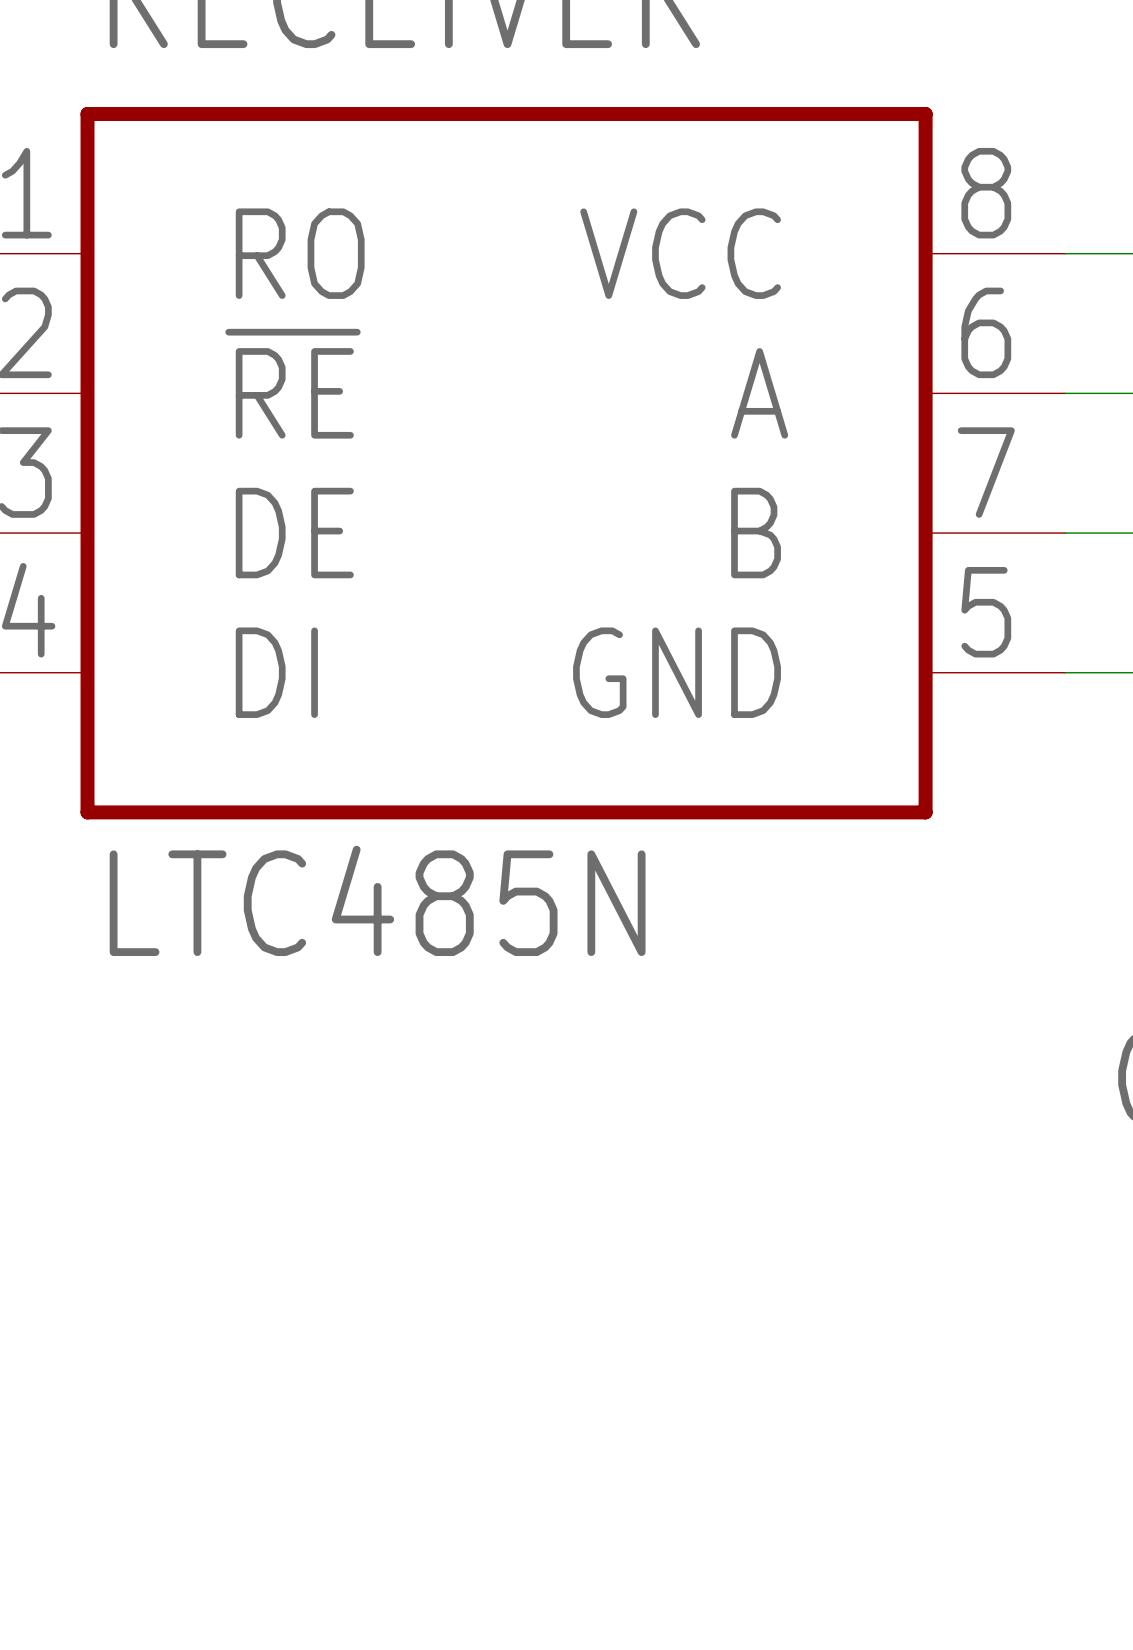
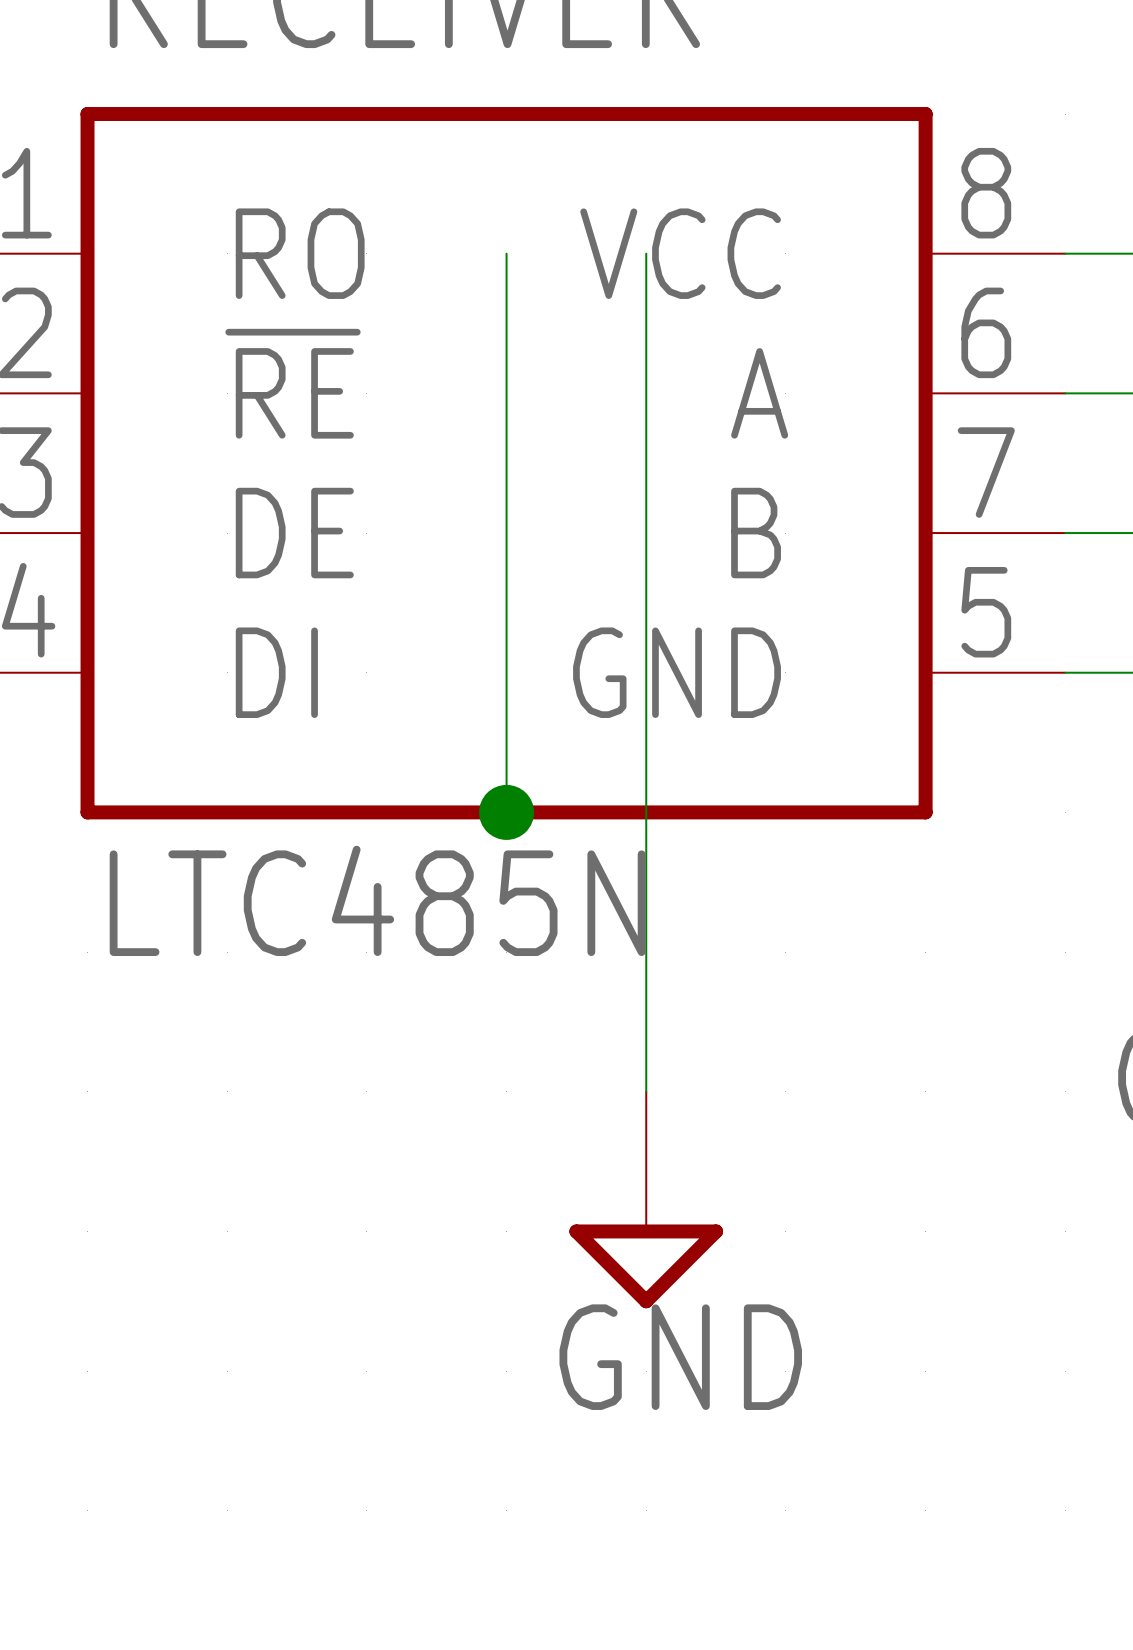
wire: none -> (506, 253) (506, 812)
wire: none -> (646, 253) (646, 1091)
junction: none -> (506, 812)
power symbol: none -> GND (646, 1200)

